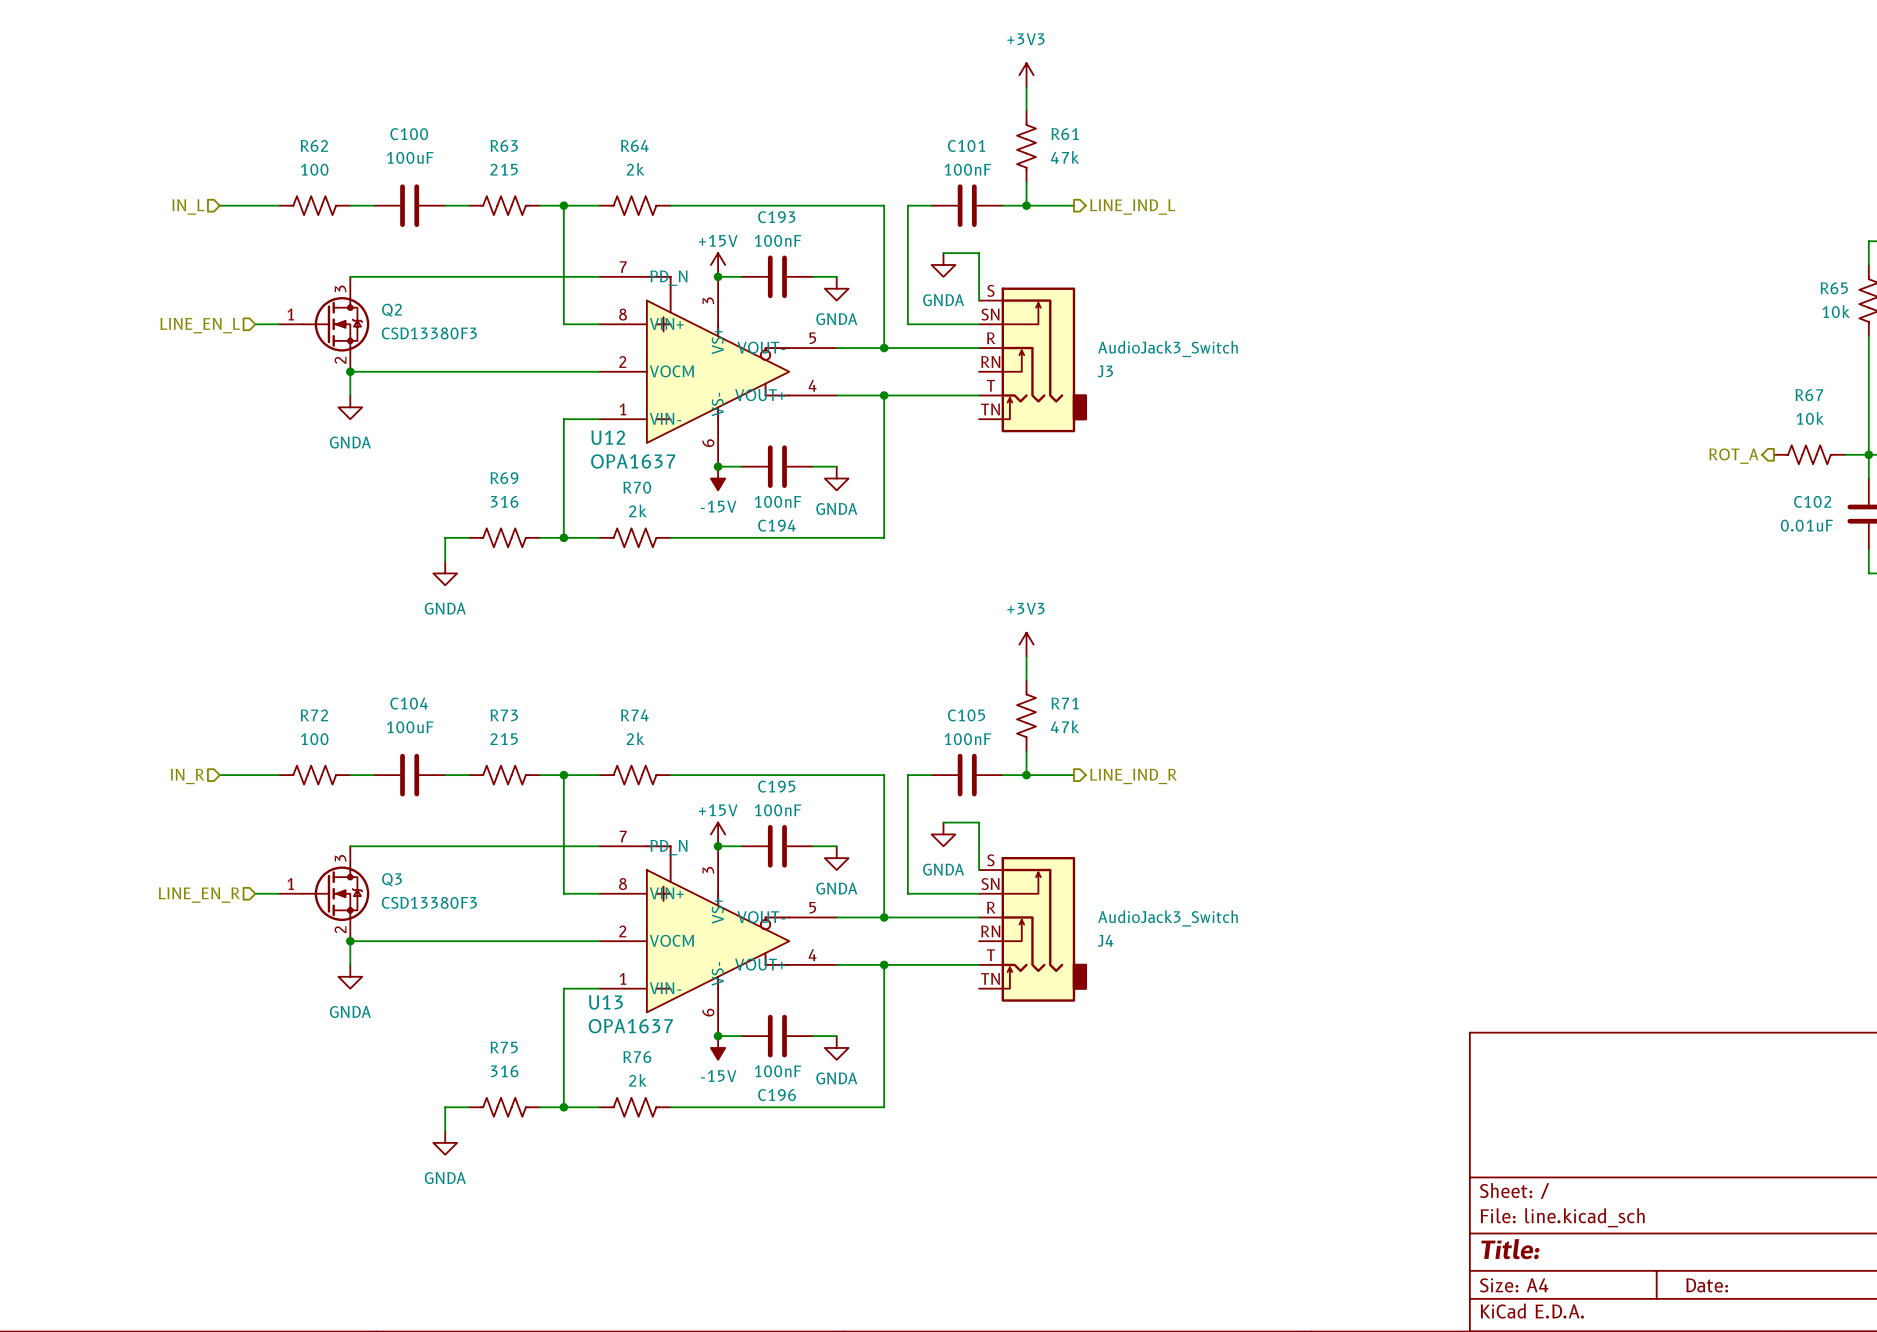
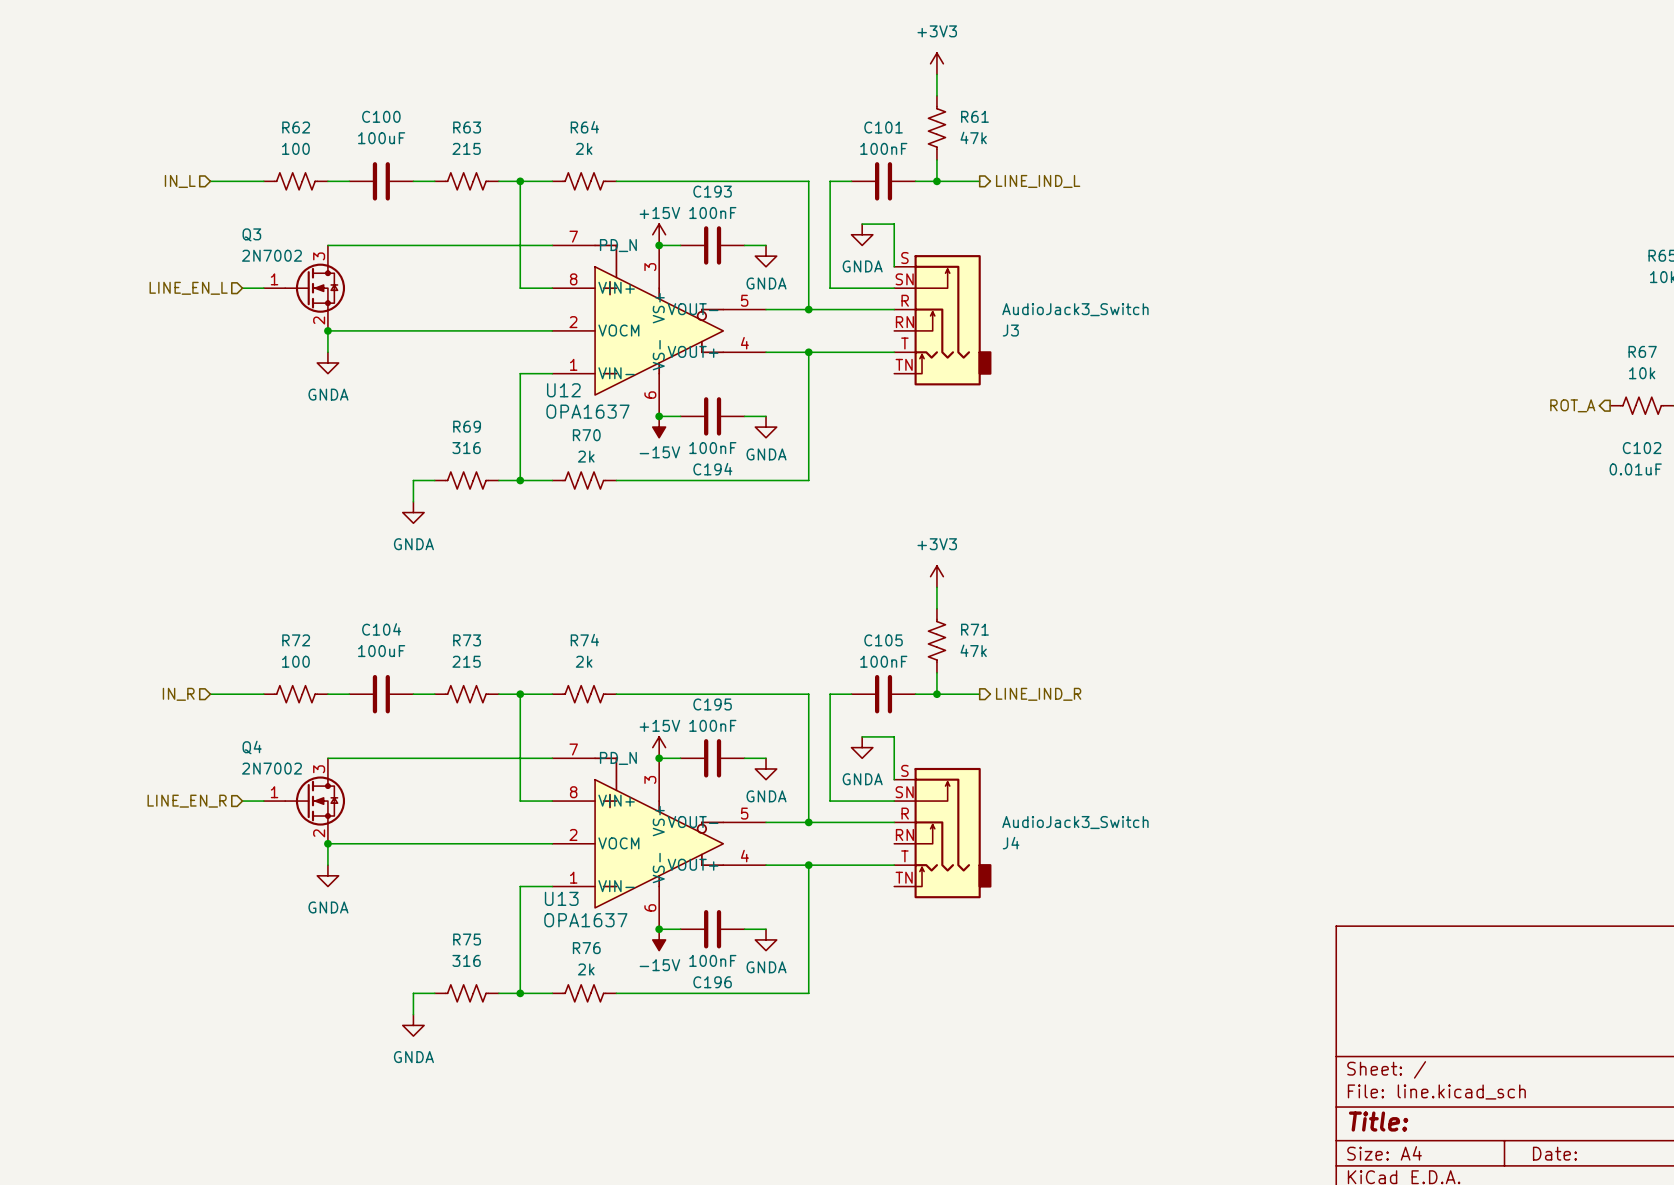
Q2: CSD13380F3 (324, 324) -> none
Q3 symbol: [279, 846, 370, 942] -> [263, 245, 346, 331]
Q3 name position: Q3 (392, 879) -> Q3 (251, 234)
Q4: none -> 2N7002 (304, 801)
Q3 value: CSD13380F3 (429, 902) -> 2N7002 (271, 255)

